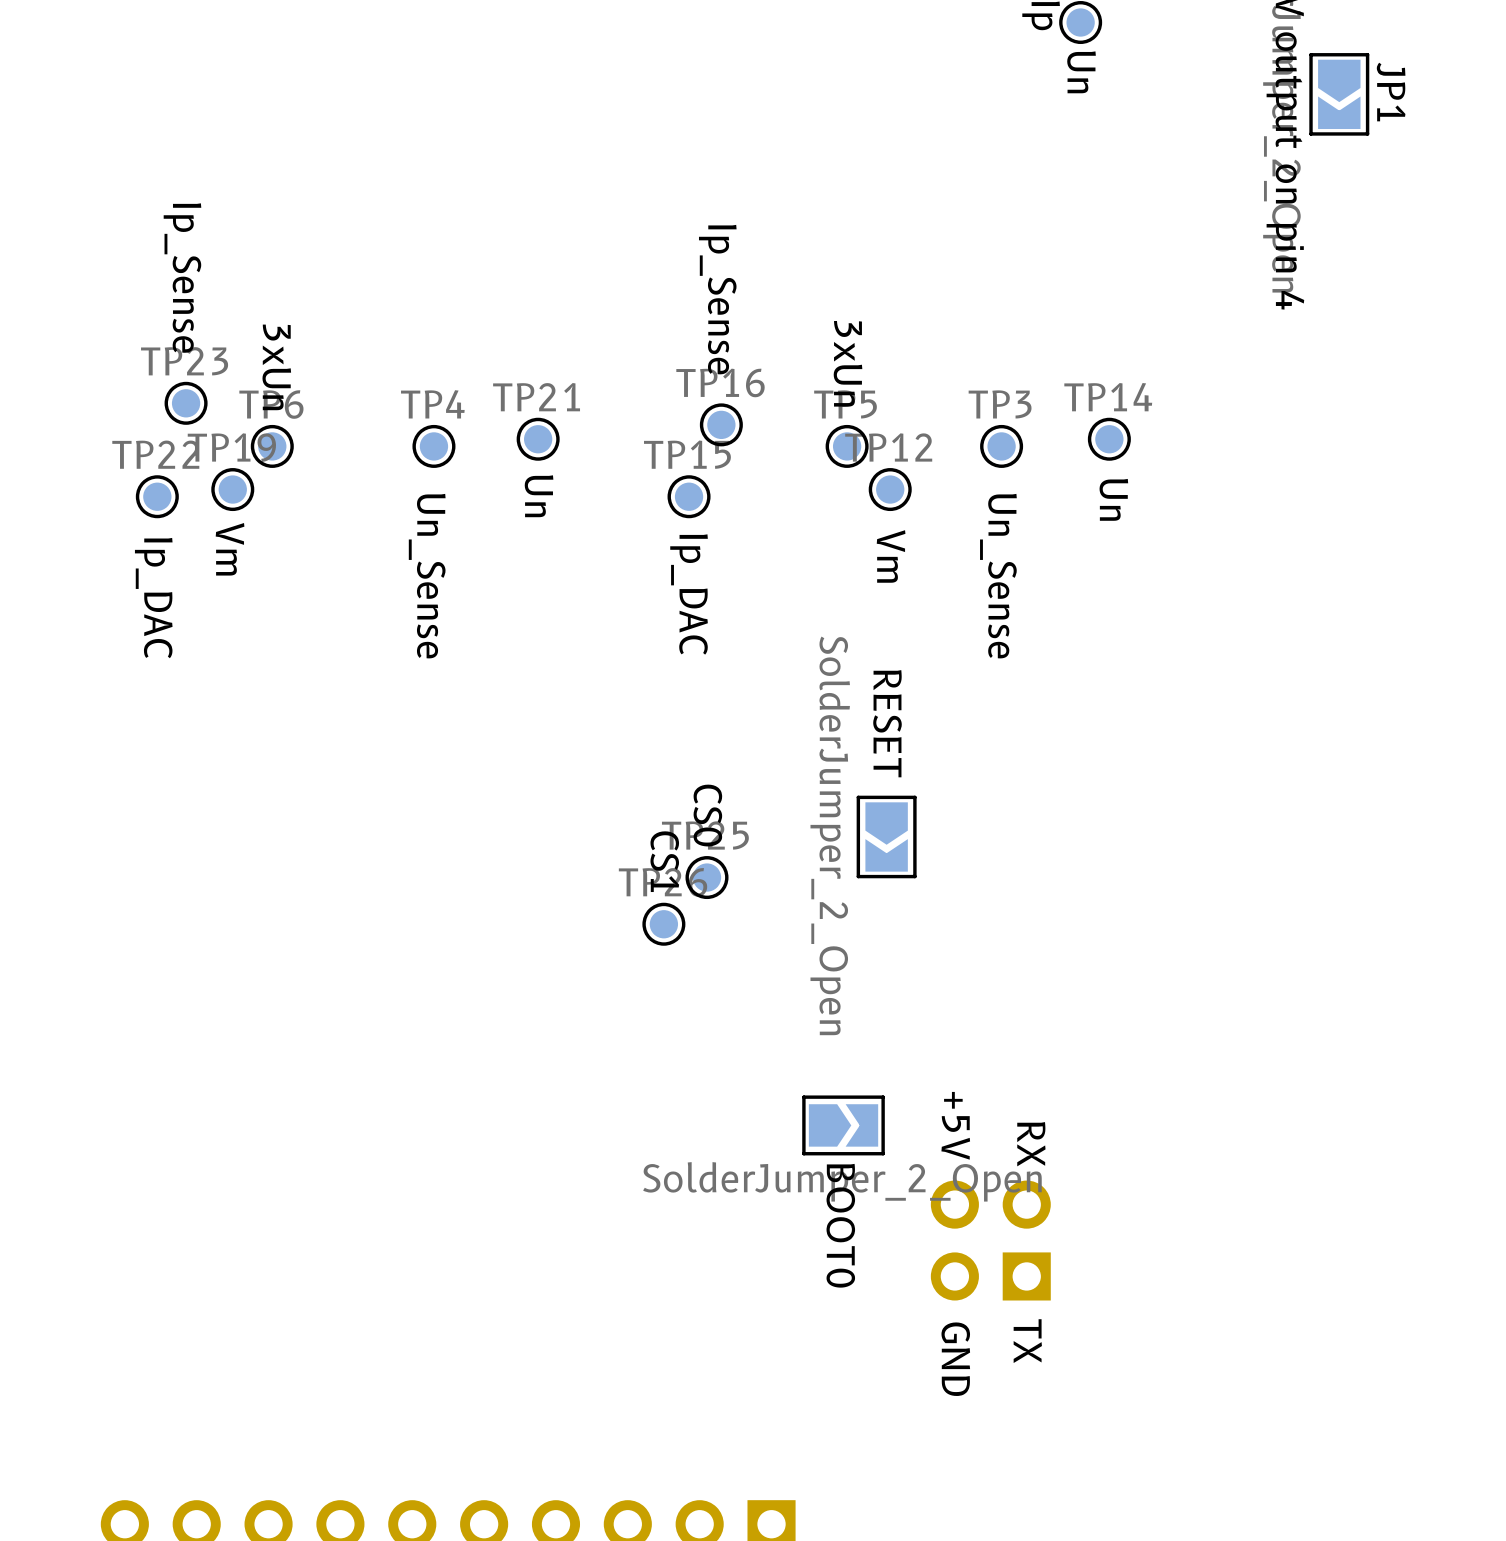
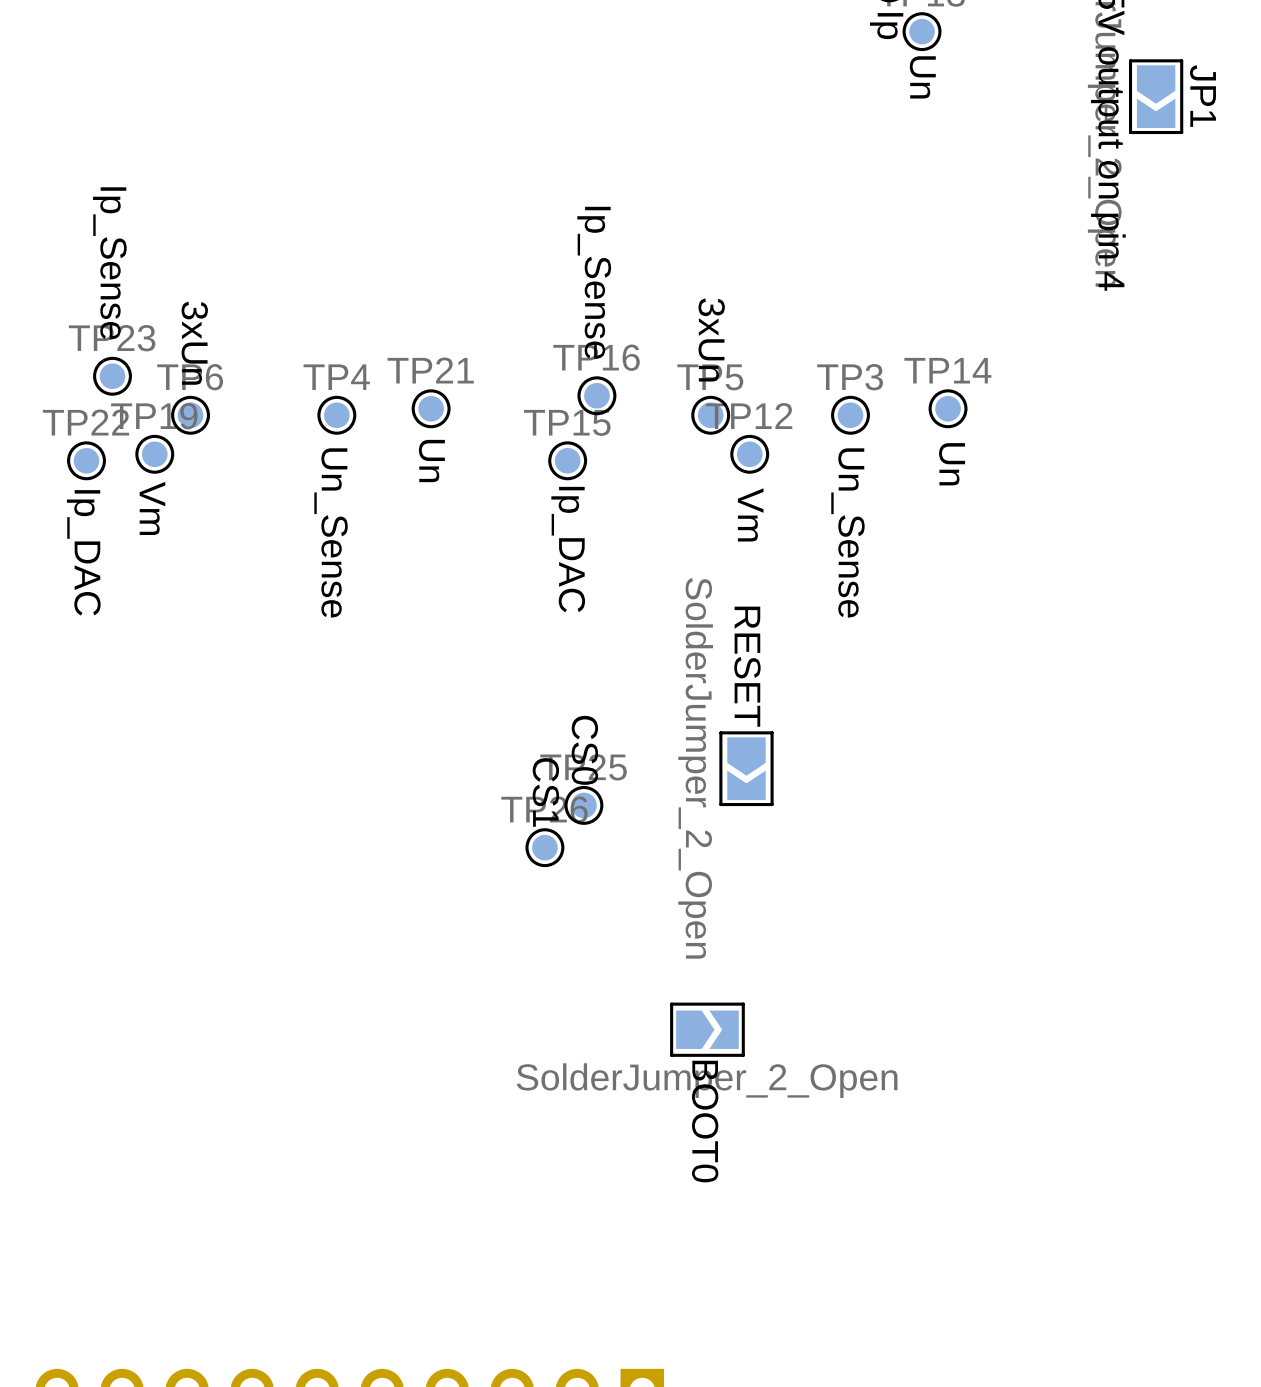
text: +5V (955, 1125) -> none
text: RX (1031, 1144) -> none
part: (990, 1240) -> none
text: TX (1027, 1341) -> none
text: GND (955, 1359) -> none

